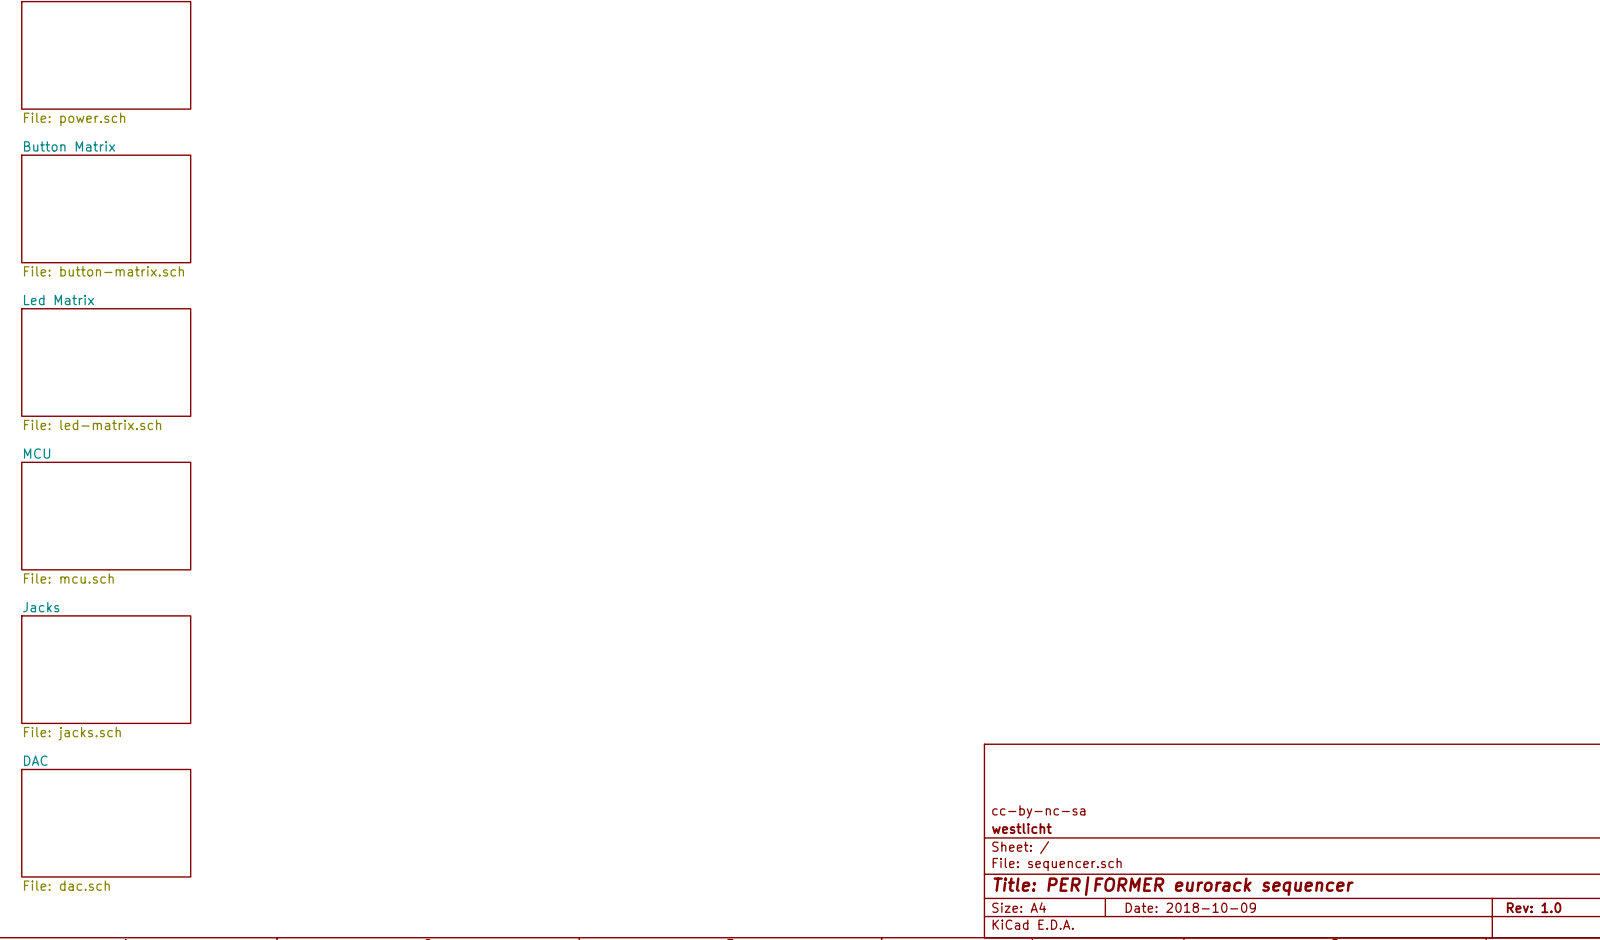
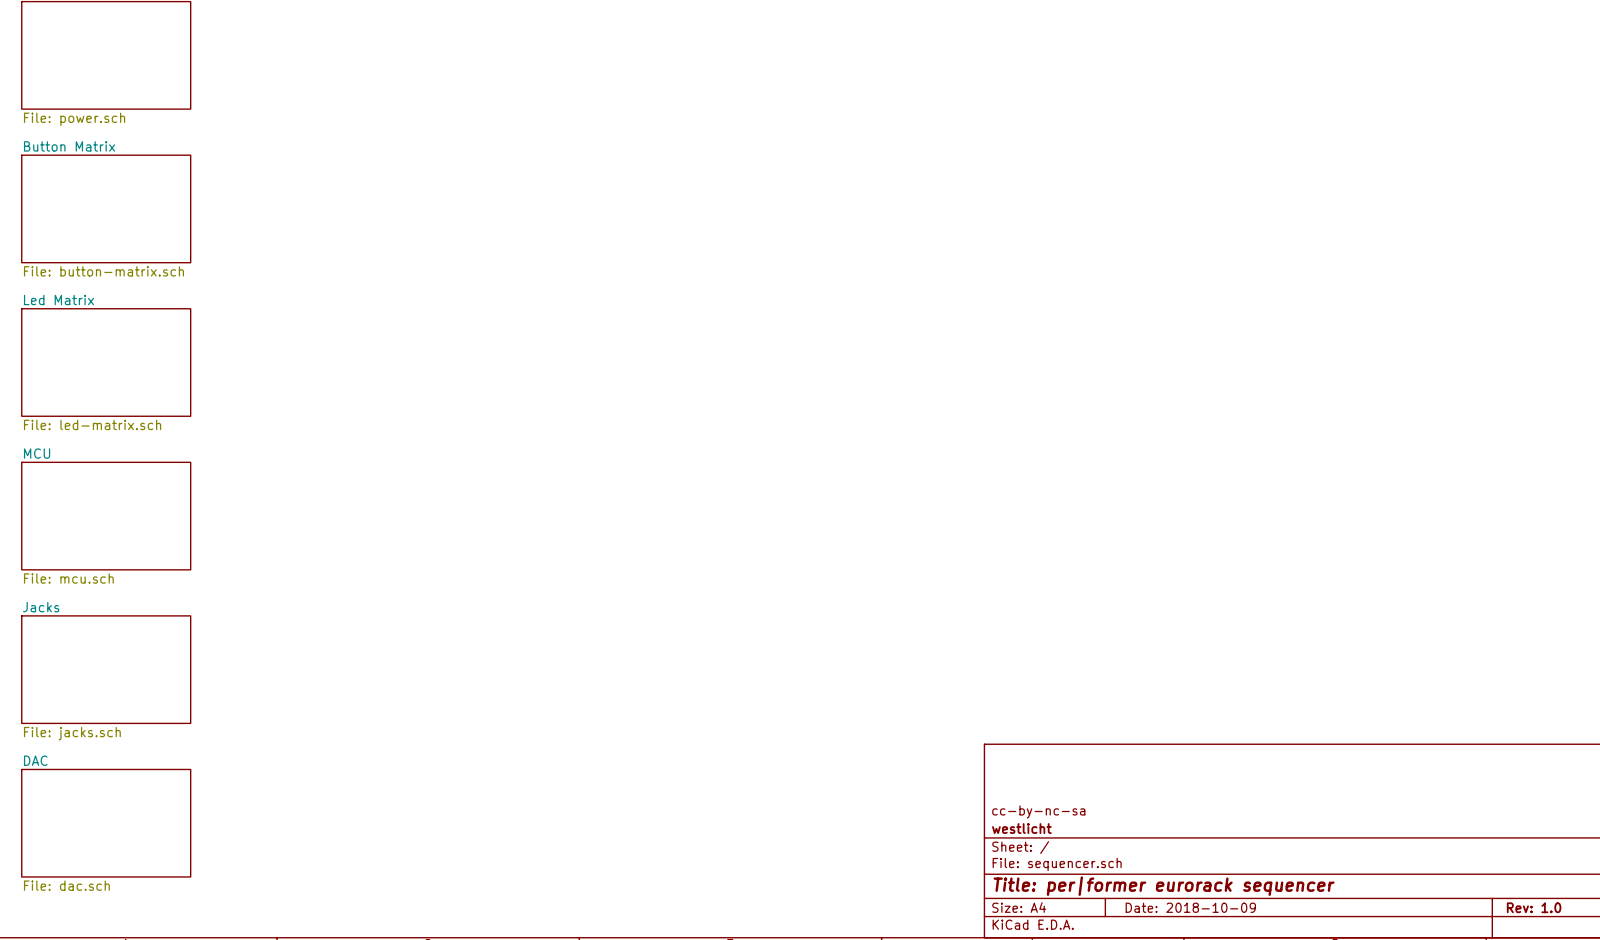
title block: Title: PER|FORMER eurorack sequencer (1173, 886) -> Title: per|former eurorack sequencer (1164, 886)

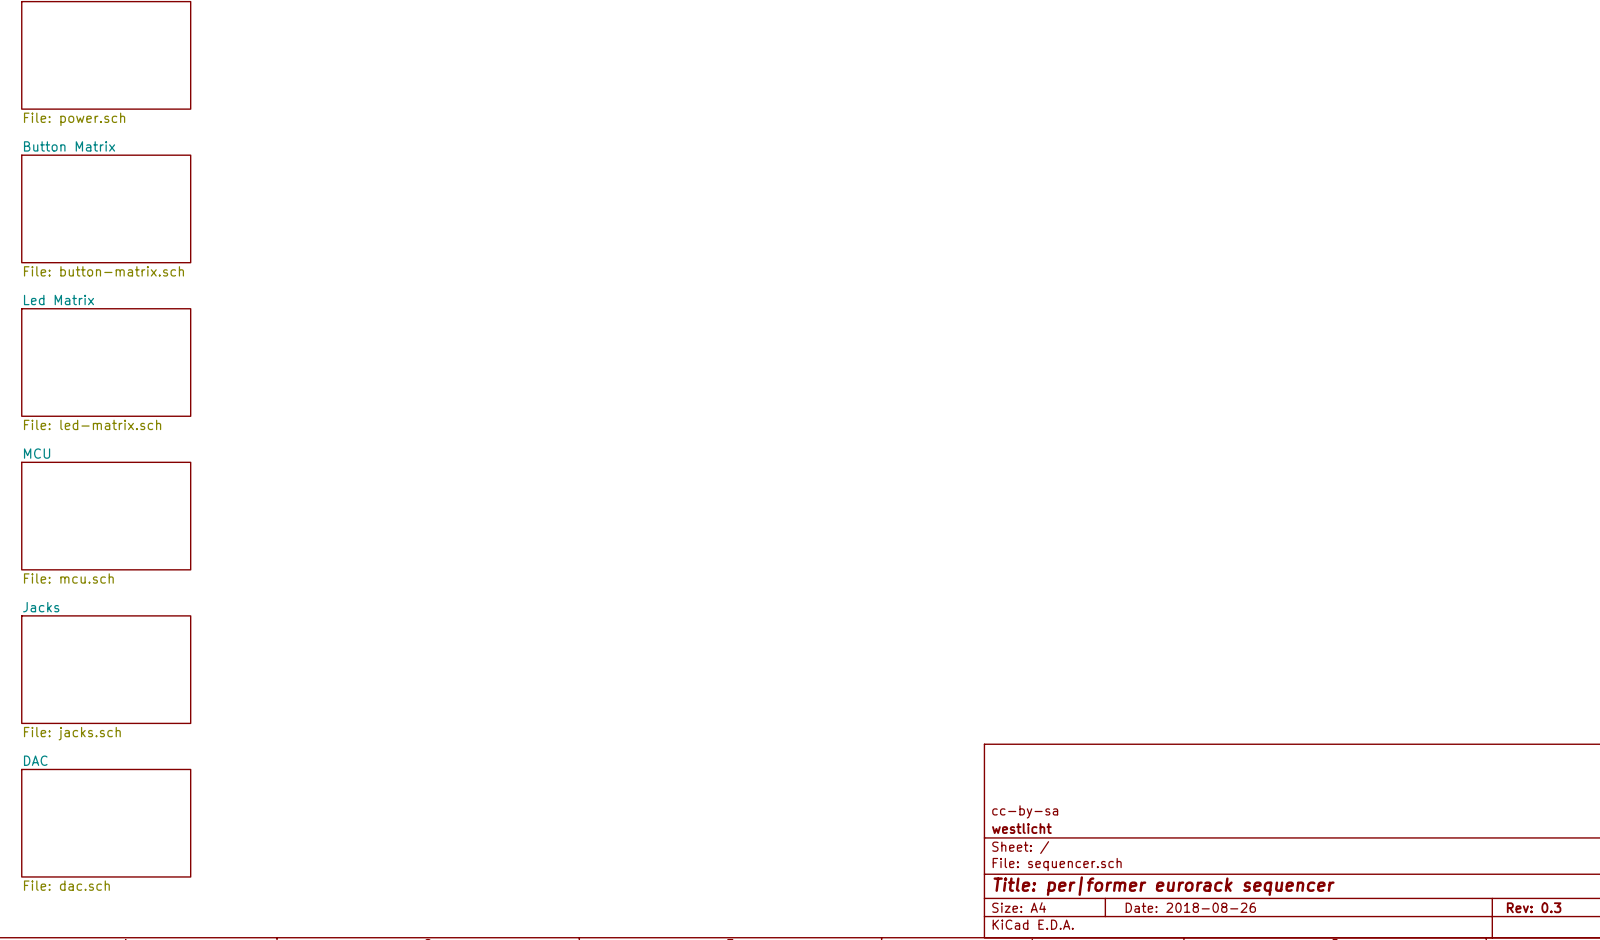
title block: cc-by-nc-sa (1038, 811) -> cc-by-sa (1025, 811)
title block: Date: 2018-10-09 (1190, 907) -> Date: 2018-08-26 (1190, 907)
title block: Rev: 1.0 (1534, 907) -> Rev: 0.3 (1534, 907)

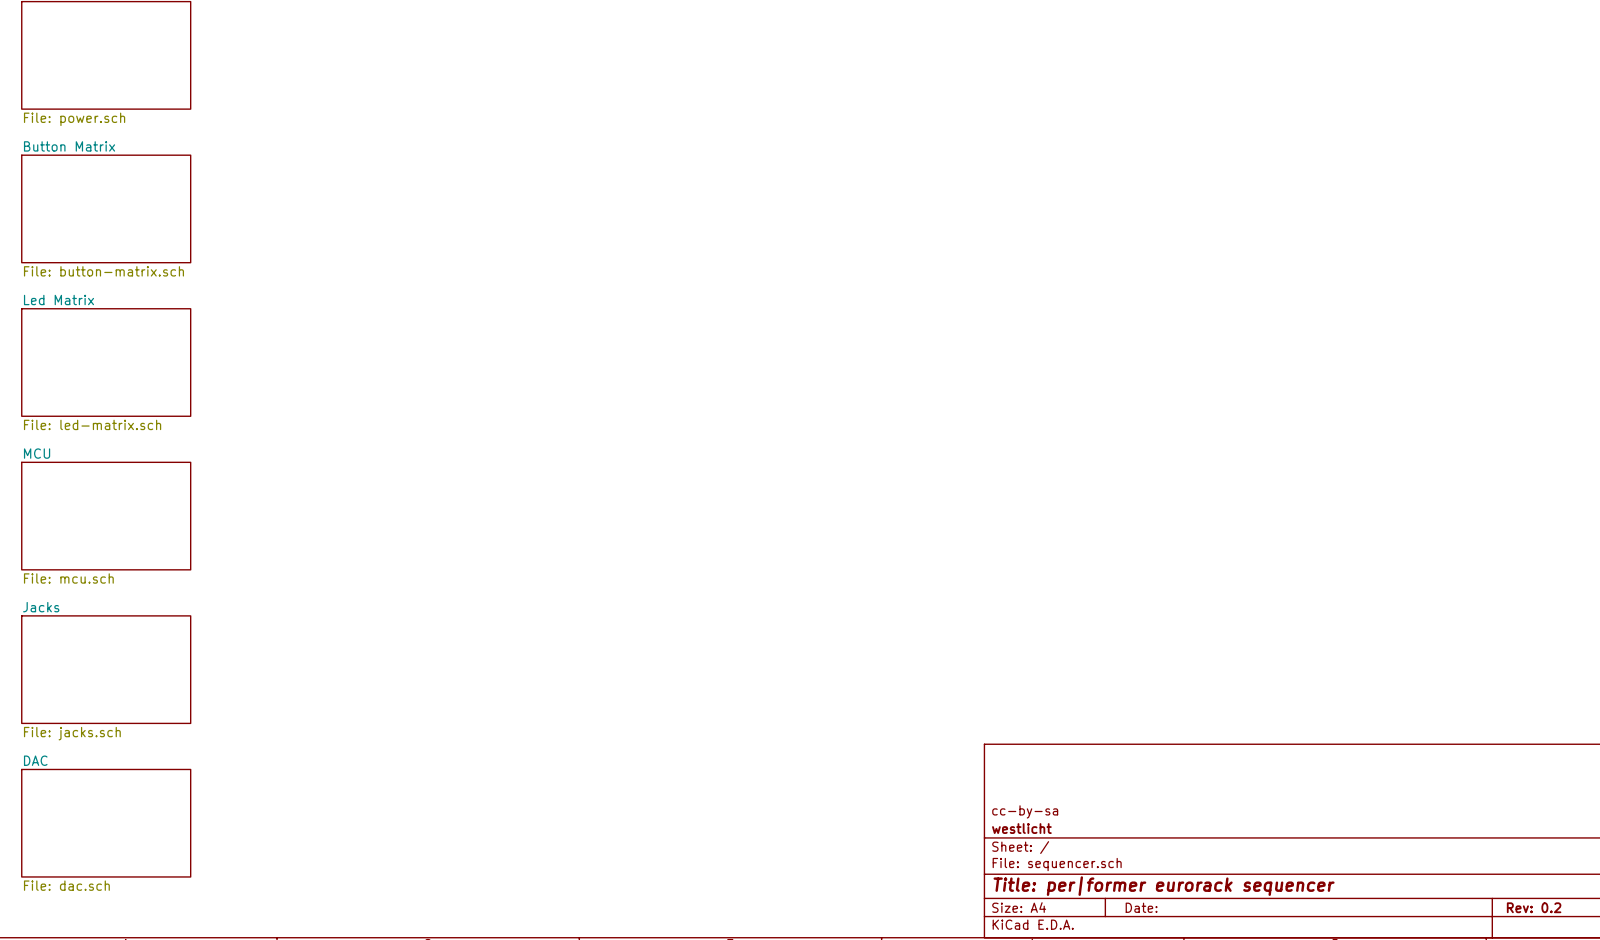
title block: Date: 2018-08-26 (1190, 907) -> Date: (1141, 907)
title block: Rev: 0.3 (1534, 907) -> Rev: 0.2 (1534, 907)

